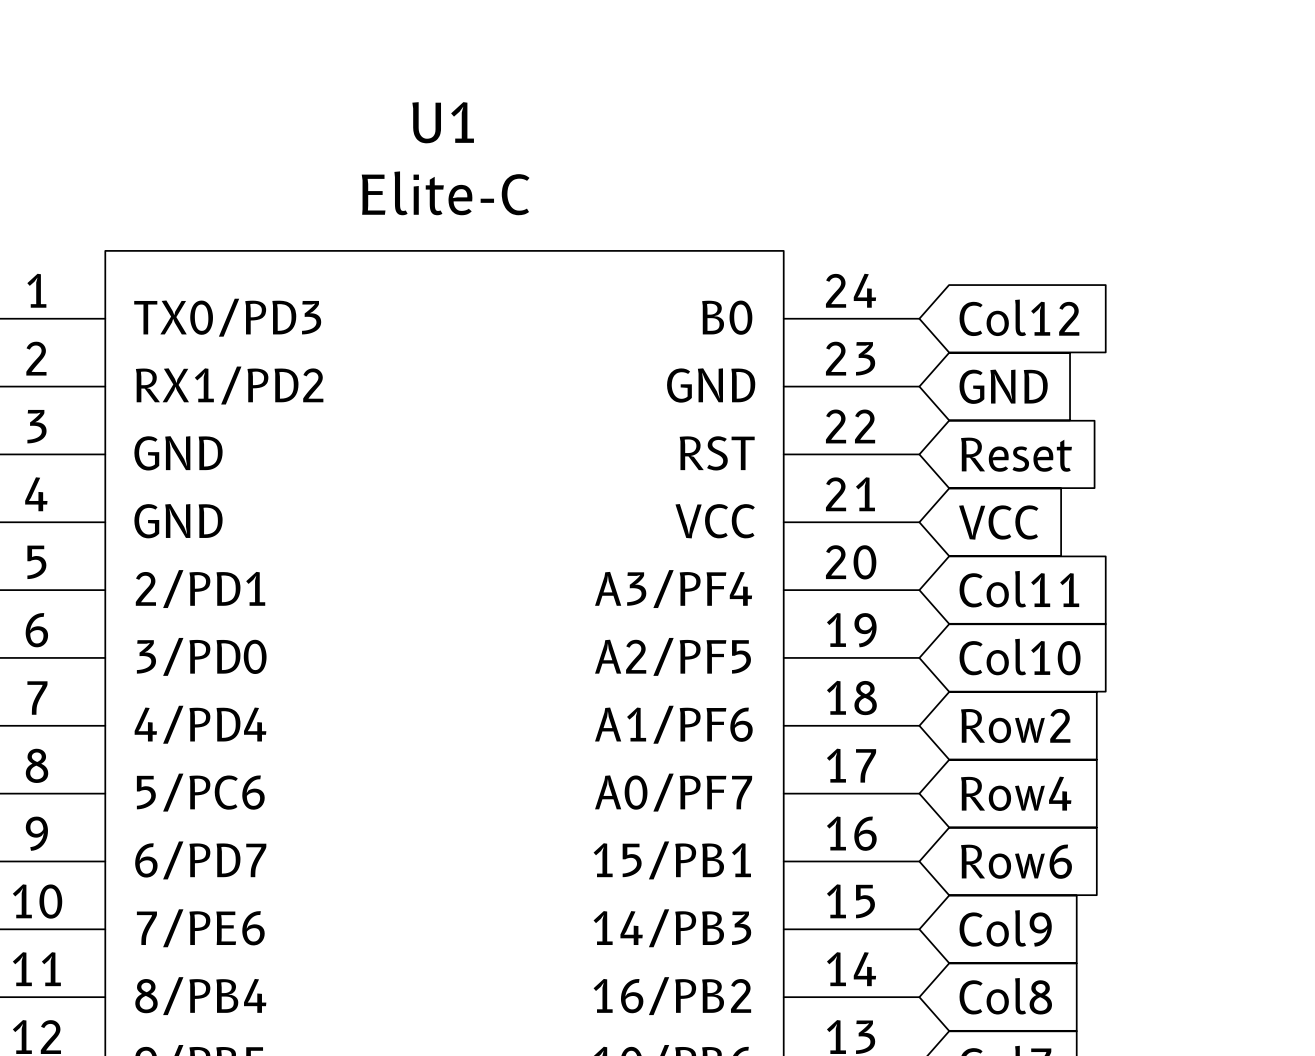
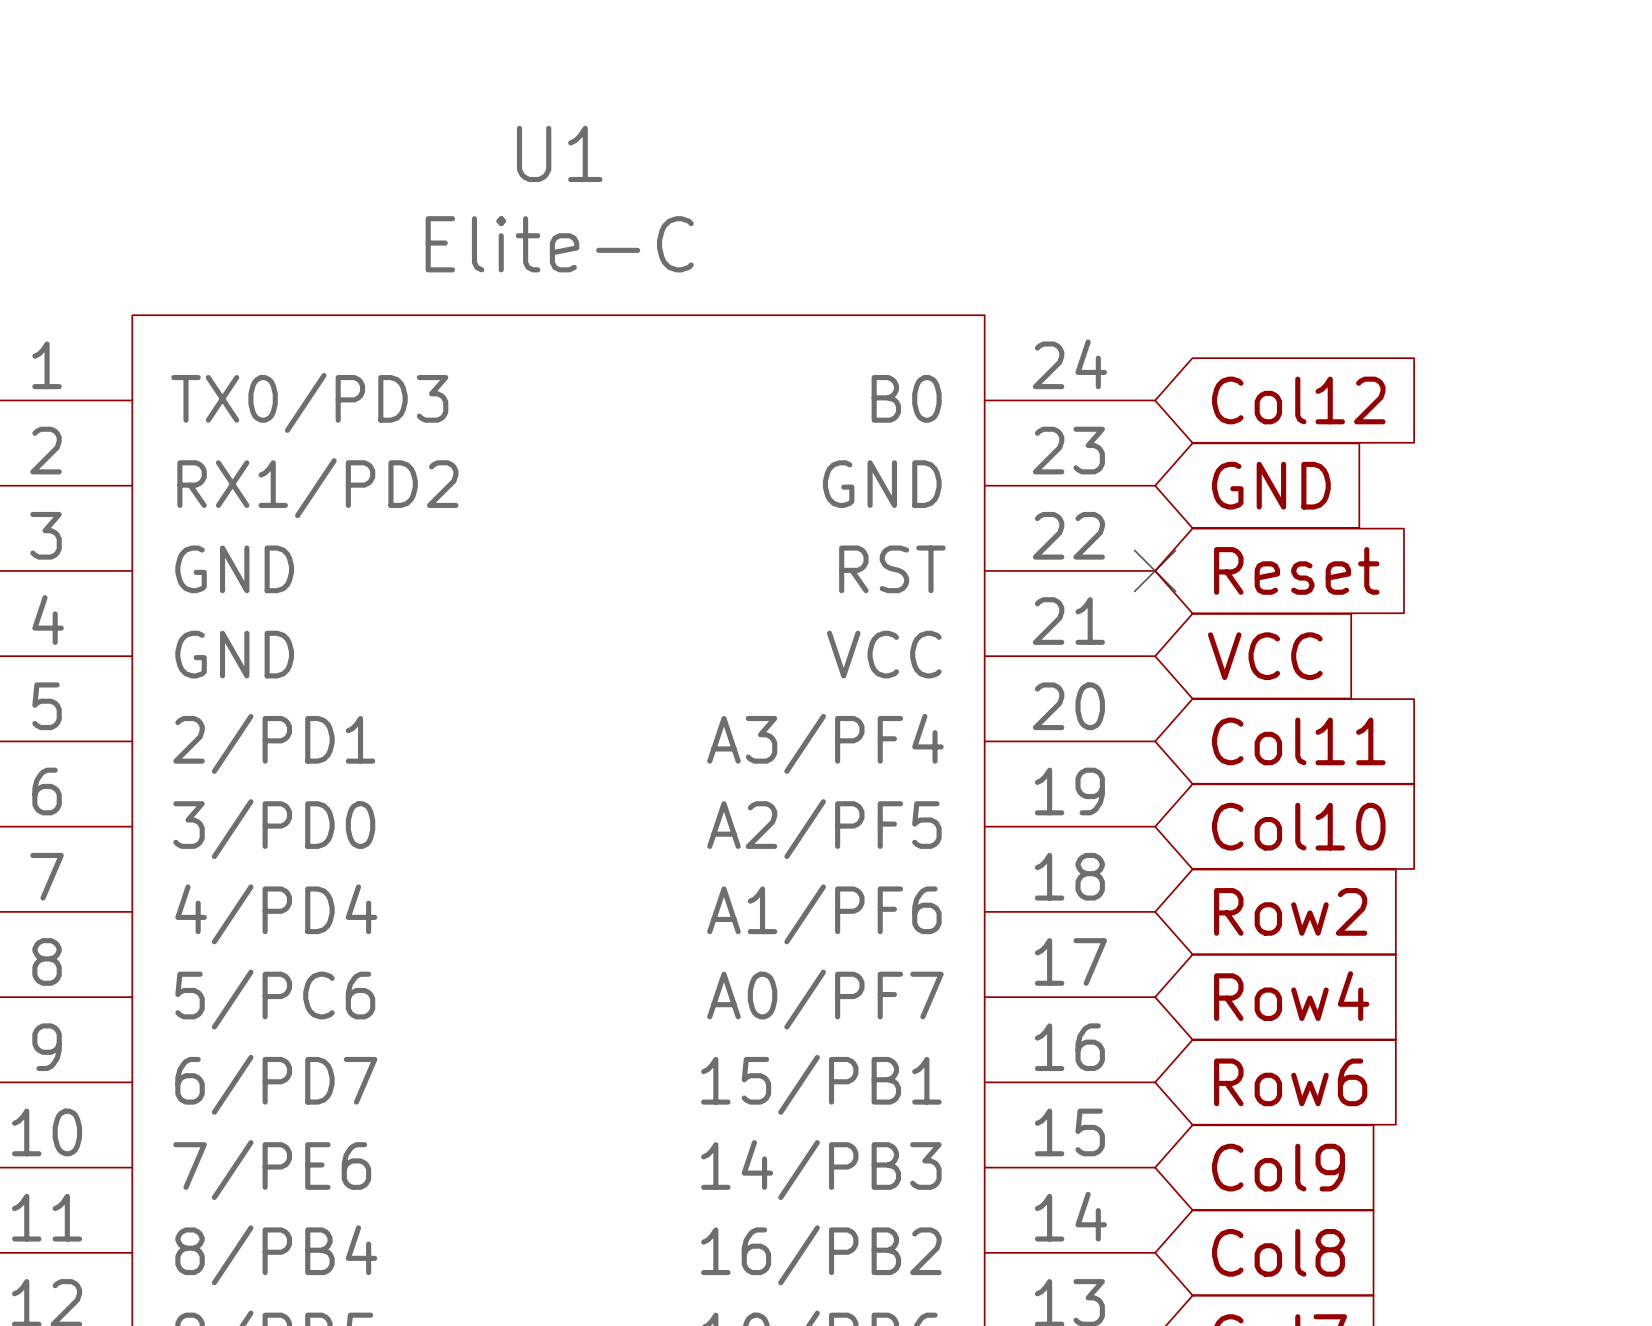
no-connect mark: none -> (1155, 570)

